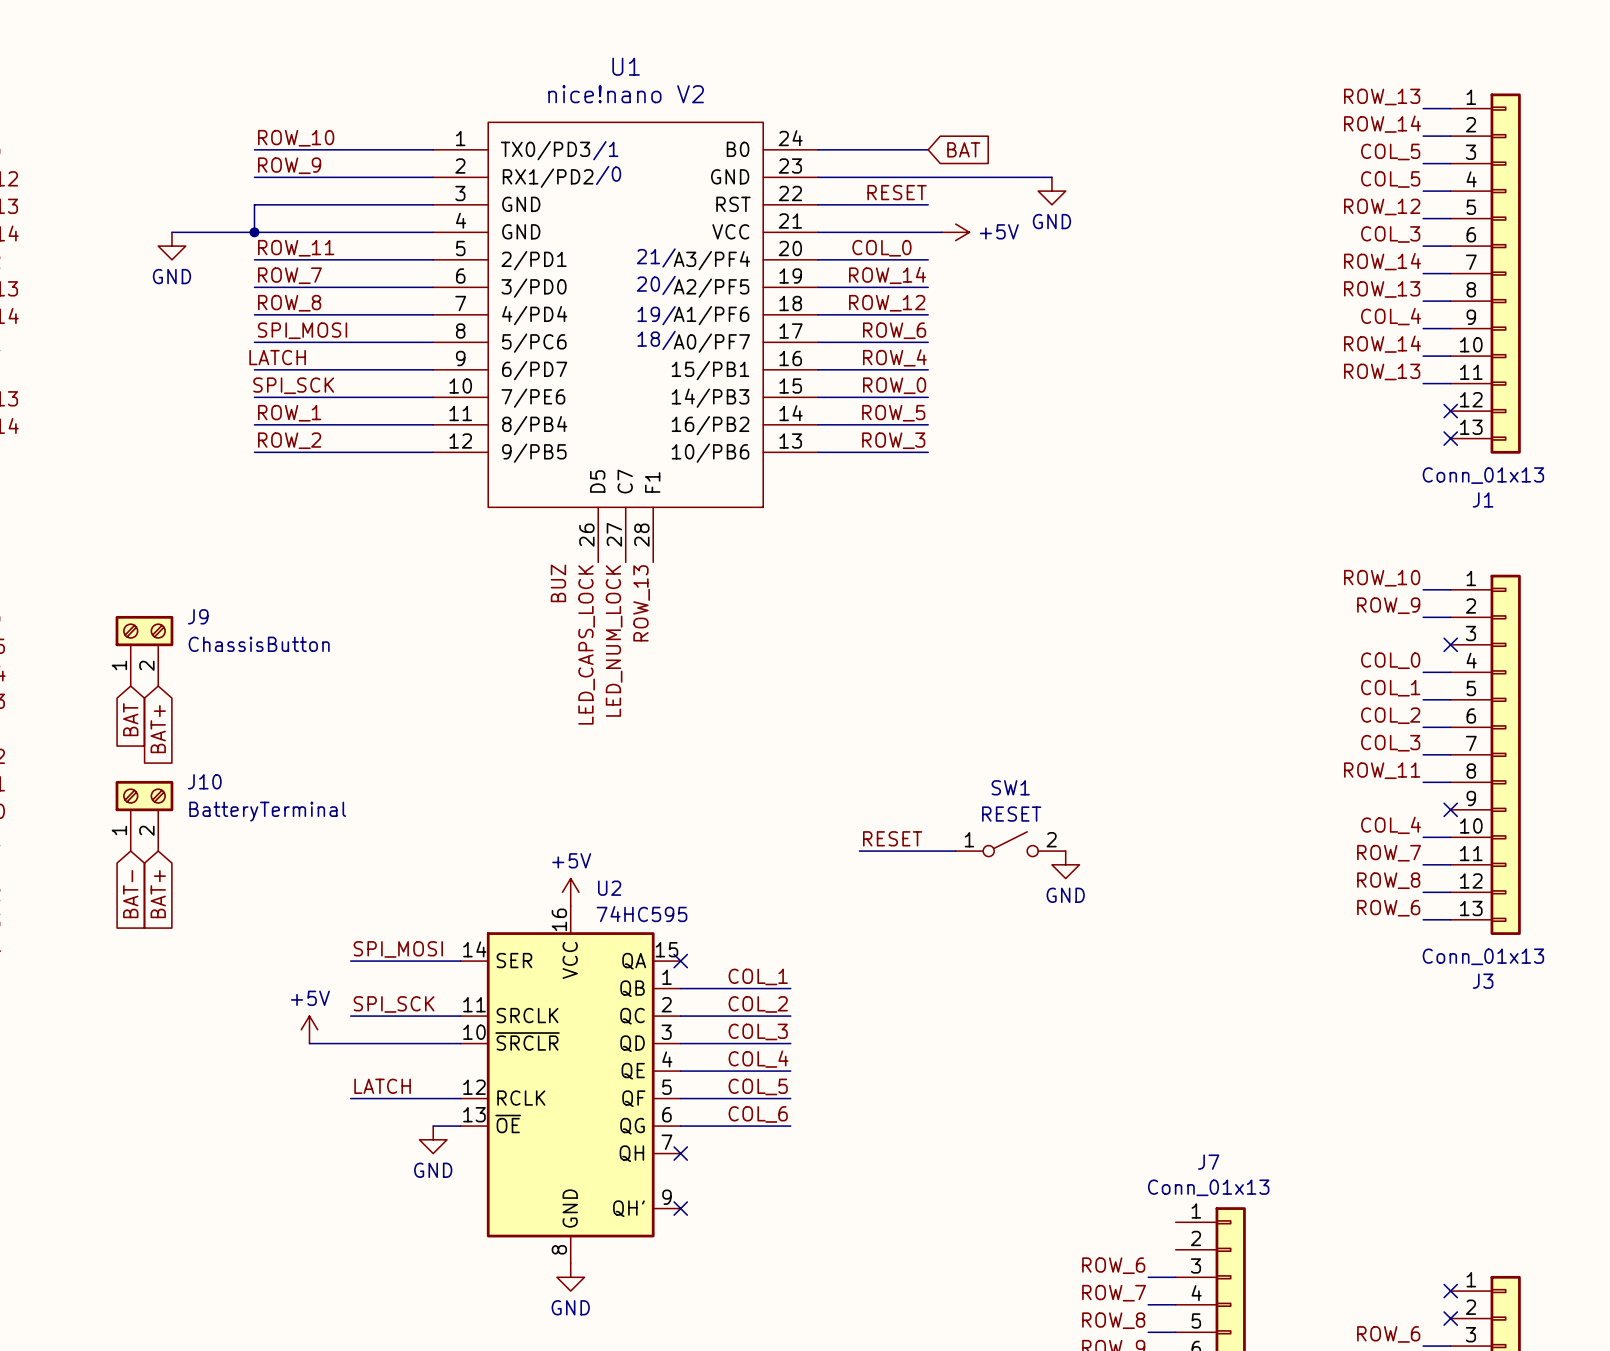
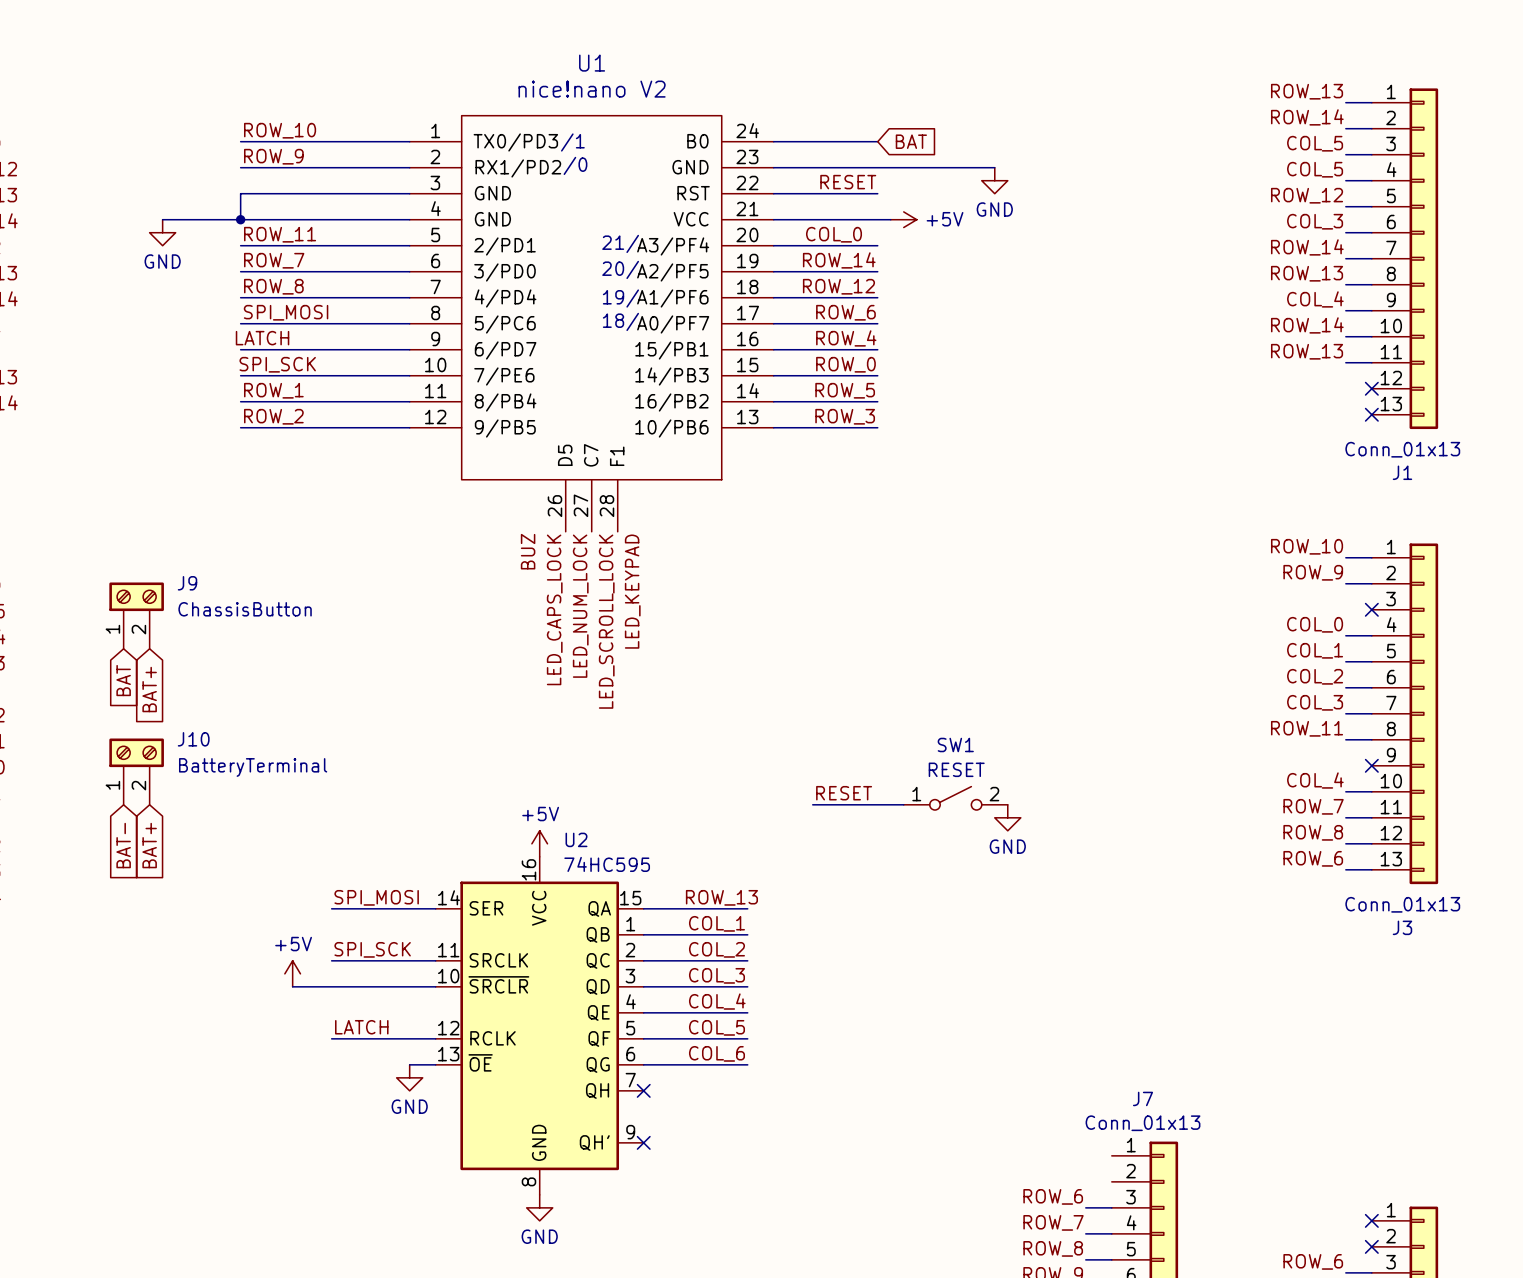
label: ROW_13 (641, 603) -> LED_SCROLL_LOCK (606, 621)
label: none -> LED_KEYPAD (632, 591)
label: none -> ROW_13 (721, 897)
wire: none -> (643, 908) (747, 908)
no-connect mark: (680, 961) -> none

